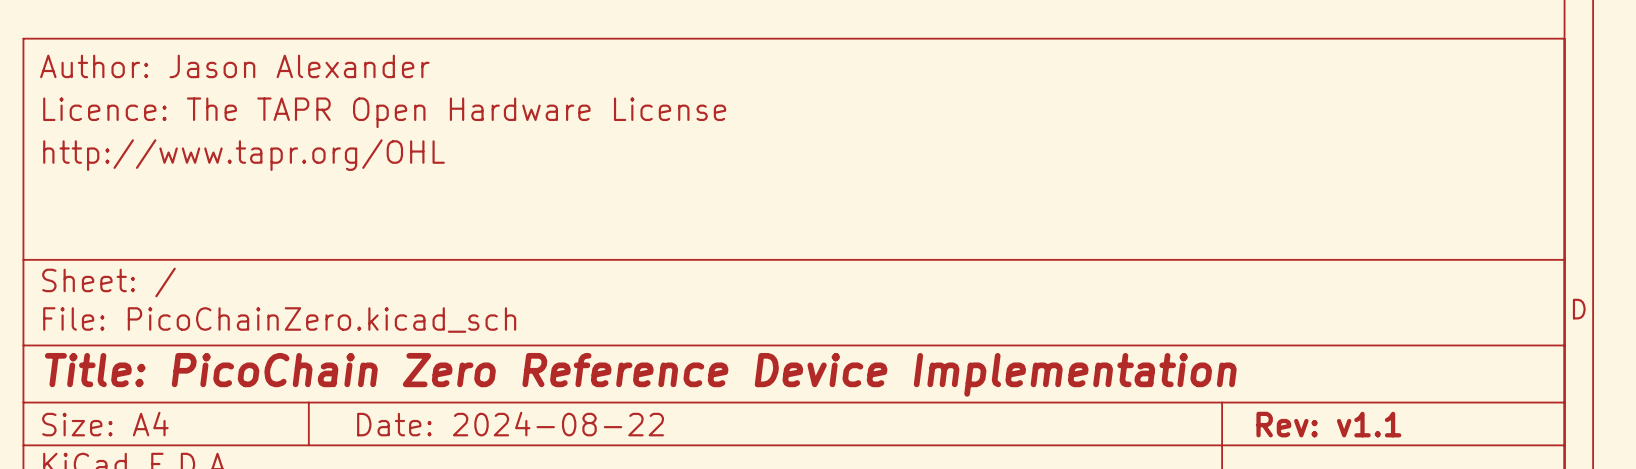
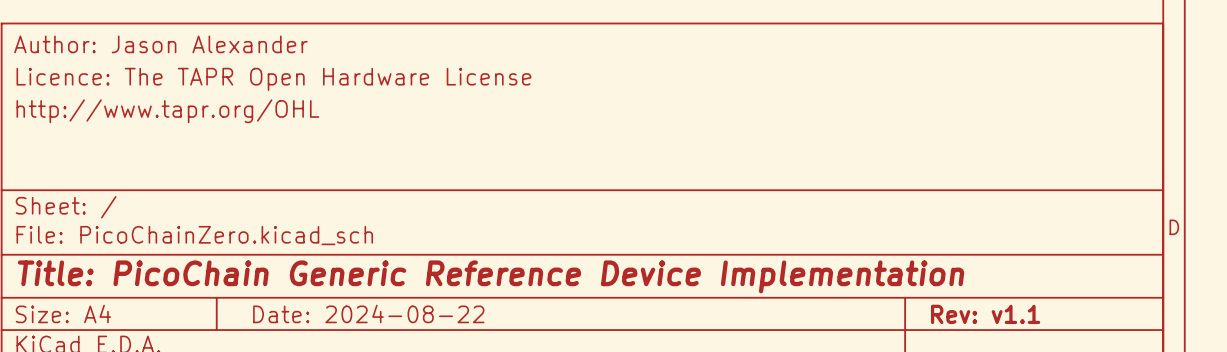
title block: Title: PicoChain Zero Reference Device Implementation (640, 374) -> Title: PicoChain Generic Reference Device Implementation (491, 276)

